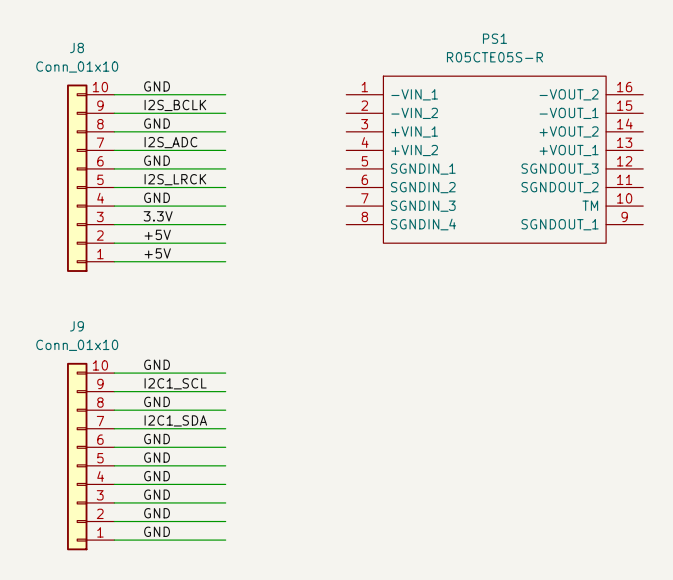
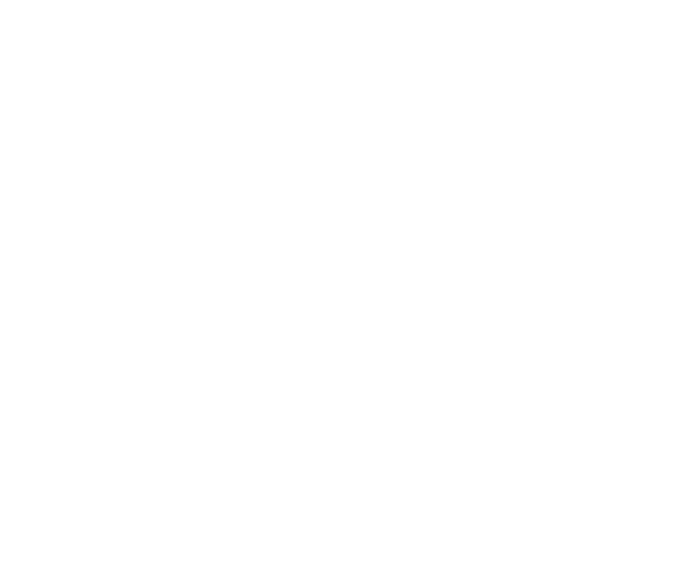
label: GND (157, 86) -> none
wire: (114, 94) (225, 94) -> none
label: I2S_BCLK (175, 105) -> none
wire: (114, 113) (225, 113) -> none
label: GND (157, 123) -> none
wire: (114, 131) (225, 131) -> none
label: I2S_ADC (170, 142) -> none
wire: (114, 150) (225, 150) -> none
PS1: R05CTE05S-R (494, 159) -> none
label: GND (157, 160) -> none
wire: (114, 168) (225, 168) -> none
J8: Conn_01x10 (90, 178) -> none
label: I2S_LRCK (175, 179) -> none
wire: (114, 187) (225, 187) -> none
label: GND (157, 197) -> none
wire: (114, 206) (225, 206) -> none
label: 3.3V (158, 216) -> none
wire: (114, 224) (225, 224) -> none
label: +5V (157, 234) -> none
wire: (114, 243) (225, 243) -> none
label: +5V (157, 253) -> none
wire: (114, 261) (225, 261) -> none
label: GND (157, 364) -> none
wire: (114, 373) (225, 373) -> none
label: I2C1_SCL (175, 383) -> none
wire: (114, 391) (225, 391) -> none
label: GND (157, 401) -> none
wire: (114, 410) (225, 410) -> none
label: I2C1_SDA (175, 420) -> none
wire: (114, 428) (225, 428) -> none
label: GND (157, 439) -> none
wire: (114, 447) (225, 447) -> none
J9: Conn_01x10 (90, 456) -> none
label: GND (157, 457) -> none
wire: (114, 465) (225, 465) -> none
label: GND (157, 476) -> none
wire: (114, 484) (225, 484) -> none
label: GND (157, 494) -> none
wire: (114, 502) (225, 502) -> none
label: GND (157, 513) -> none
wire: (114, 521) (225, 521) -> none
label: GND (157, 531) -> none
wire: (114, 540) (225, 540) -> none

